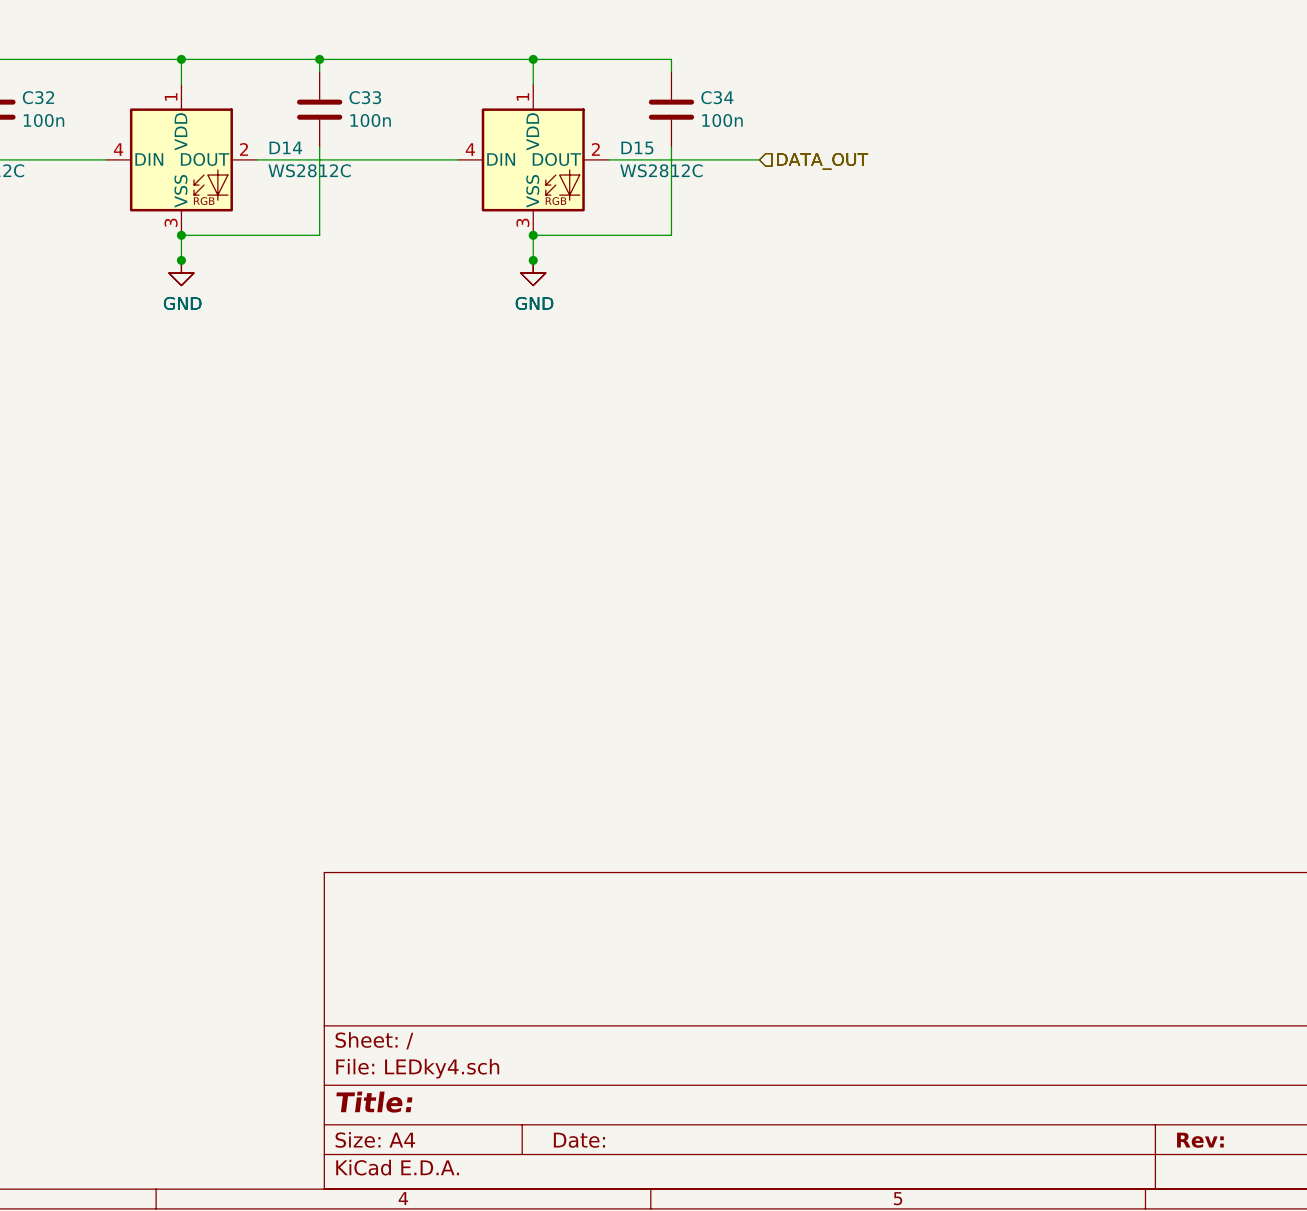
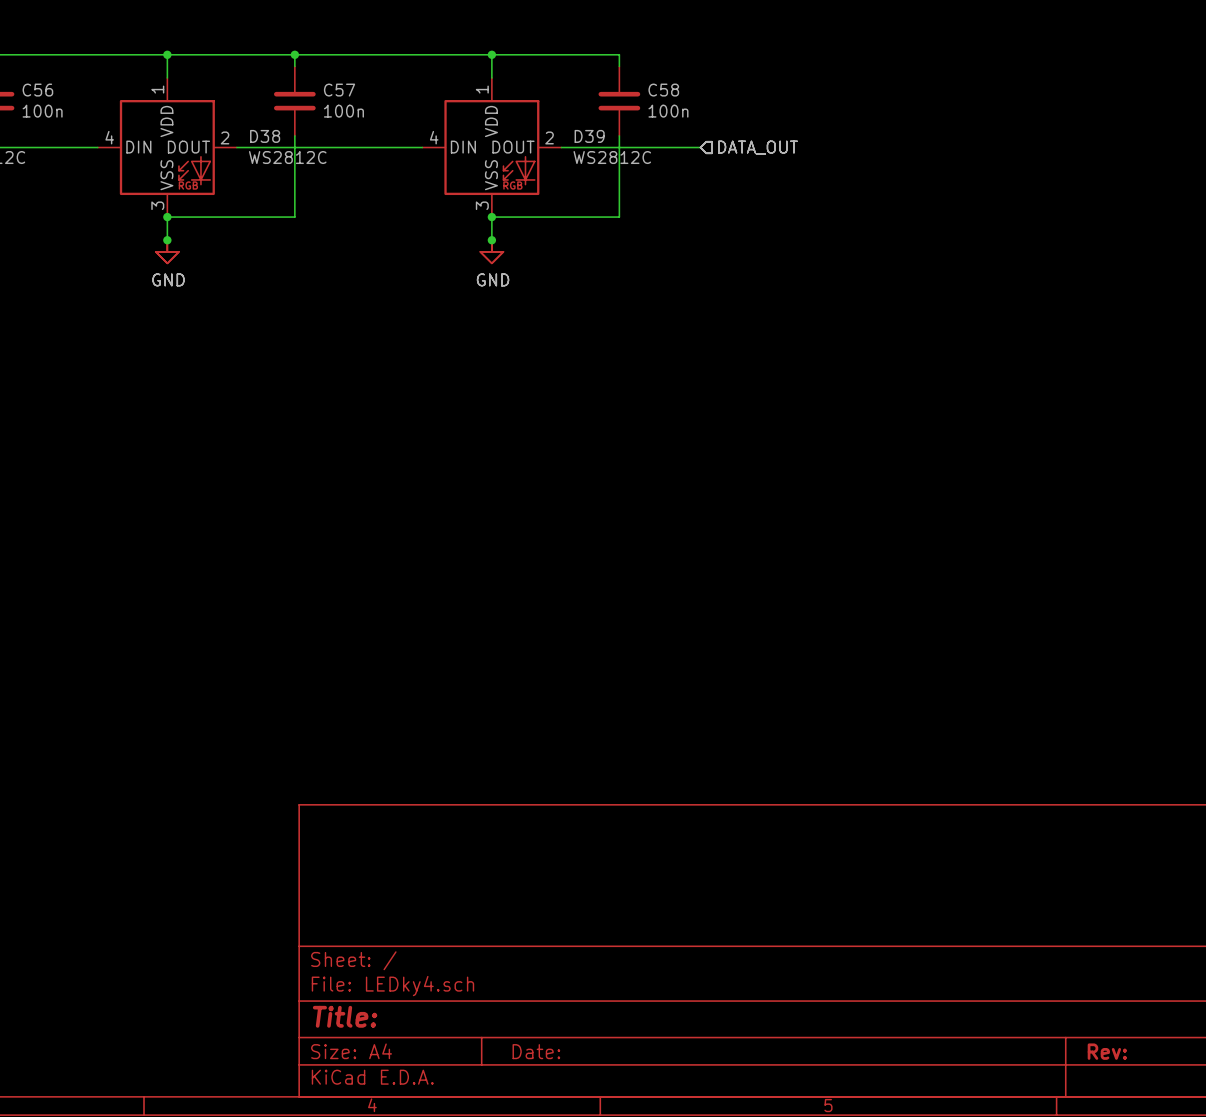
C32 name: C32 (38, 97) -> C56 (37, 90)
C33 name: C33 (365, 97) -> C57 (339, 90)
C34 name: C34 (717, 97) -> C58 (663, 90)
D14 name: D14 (285, 147) -> D38 (265, 136)
D15 name: D15 (637, 148) -> D39 (589, 136)

